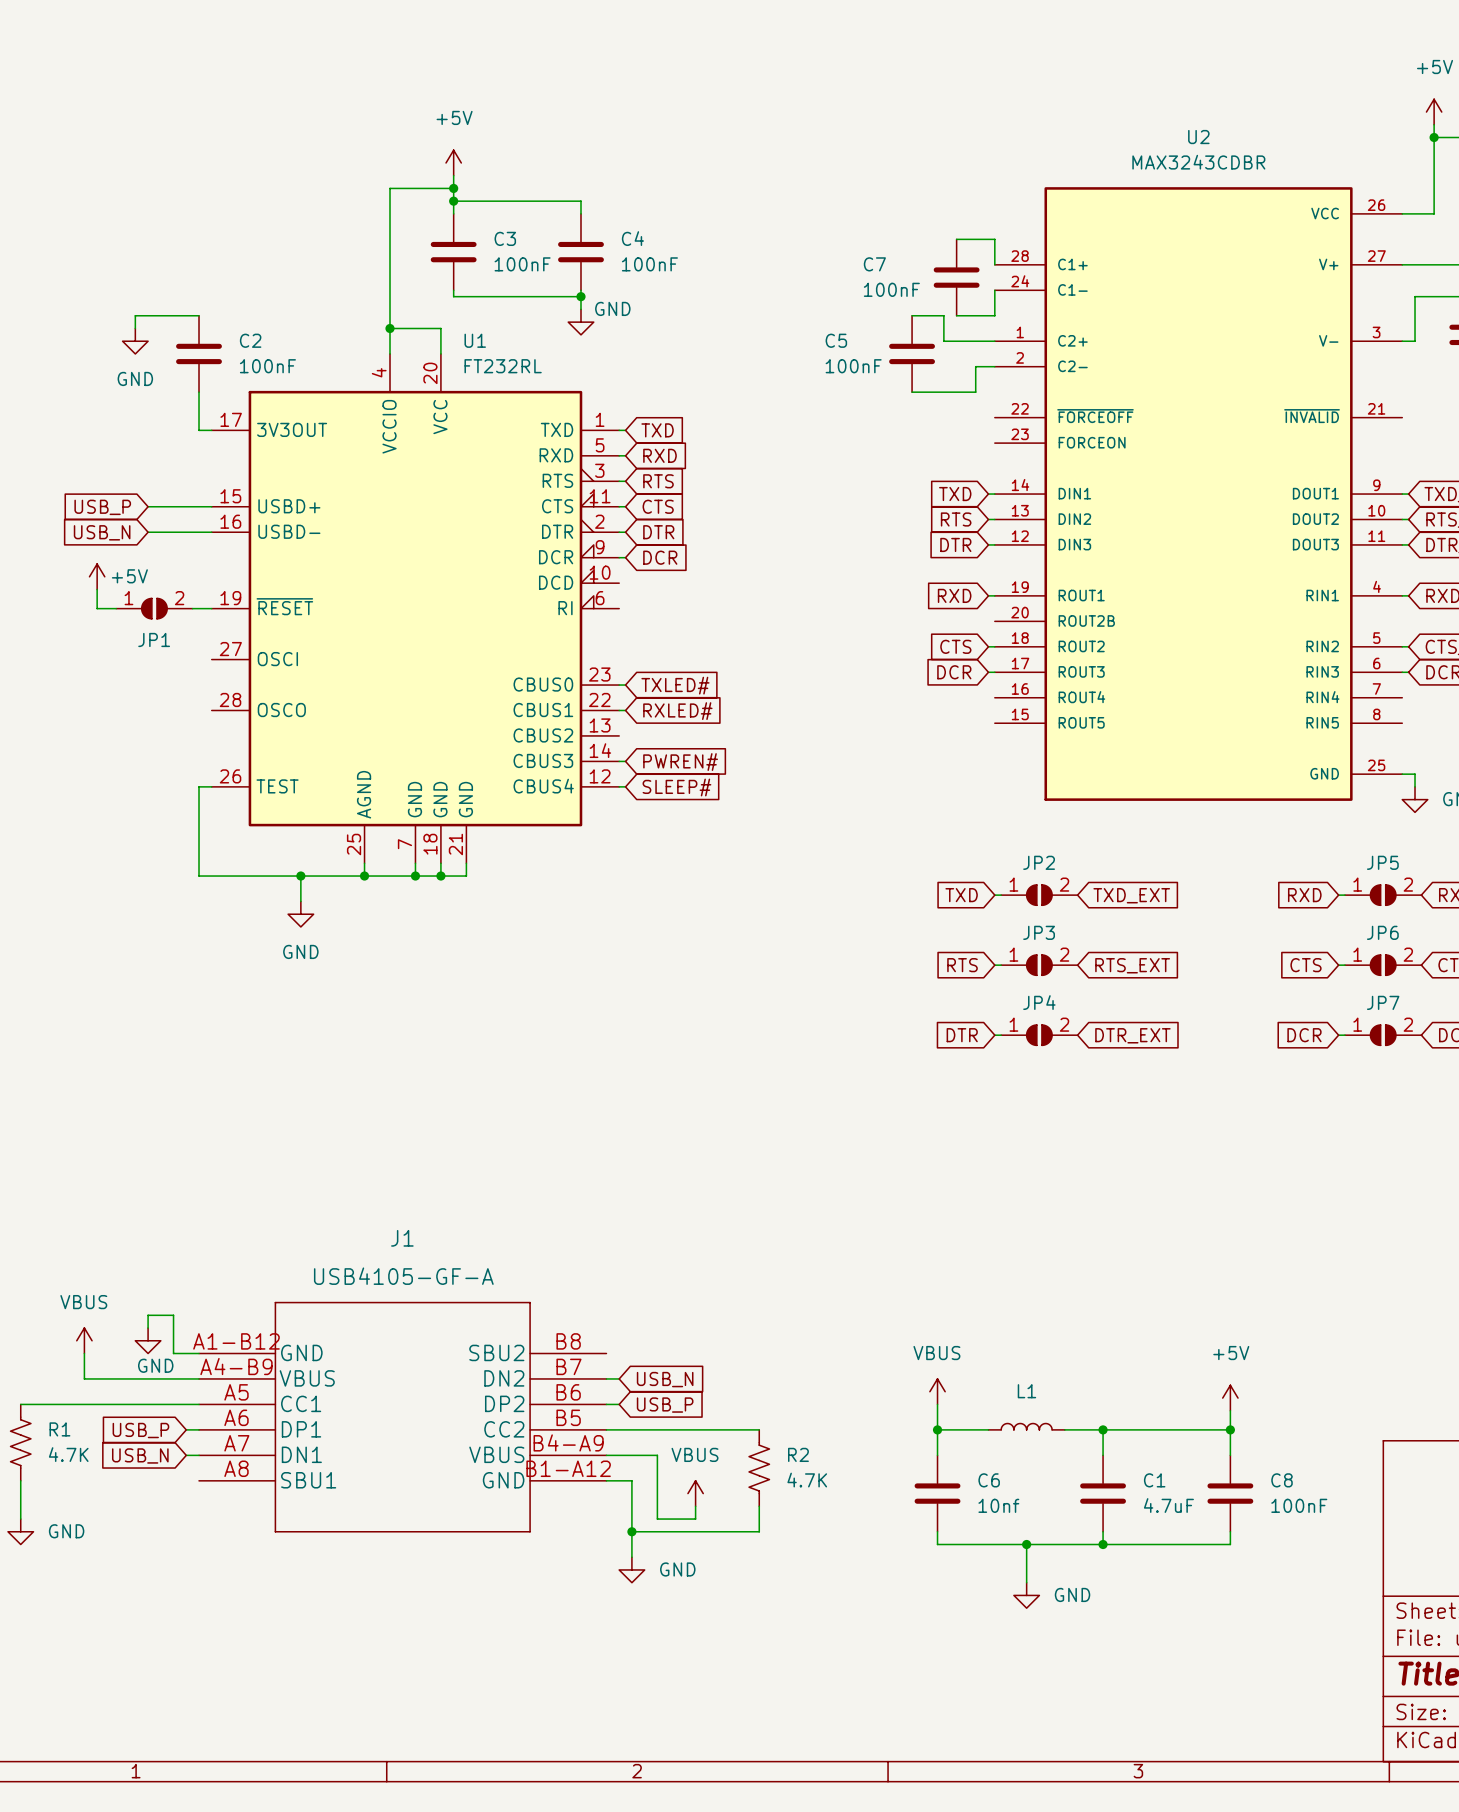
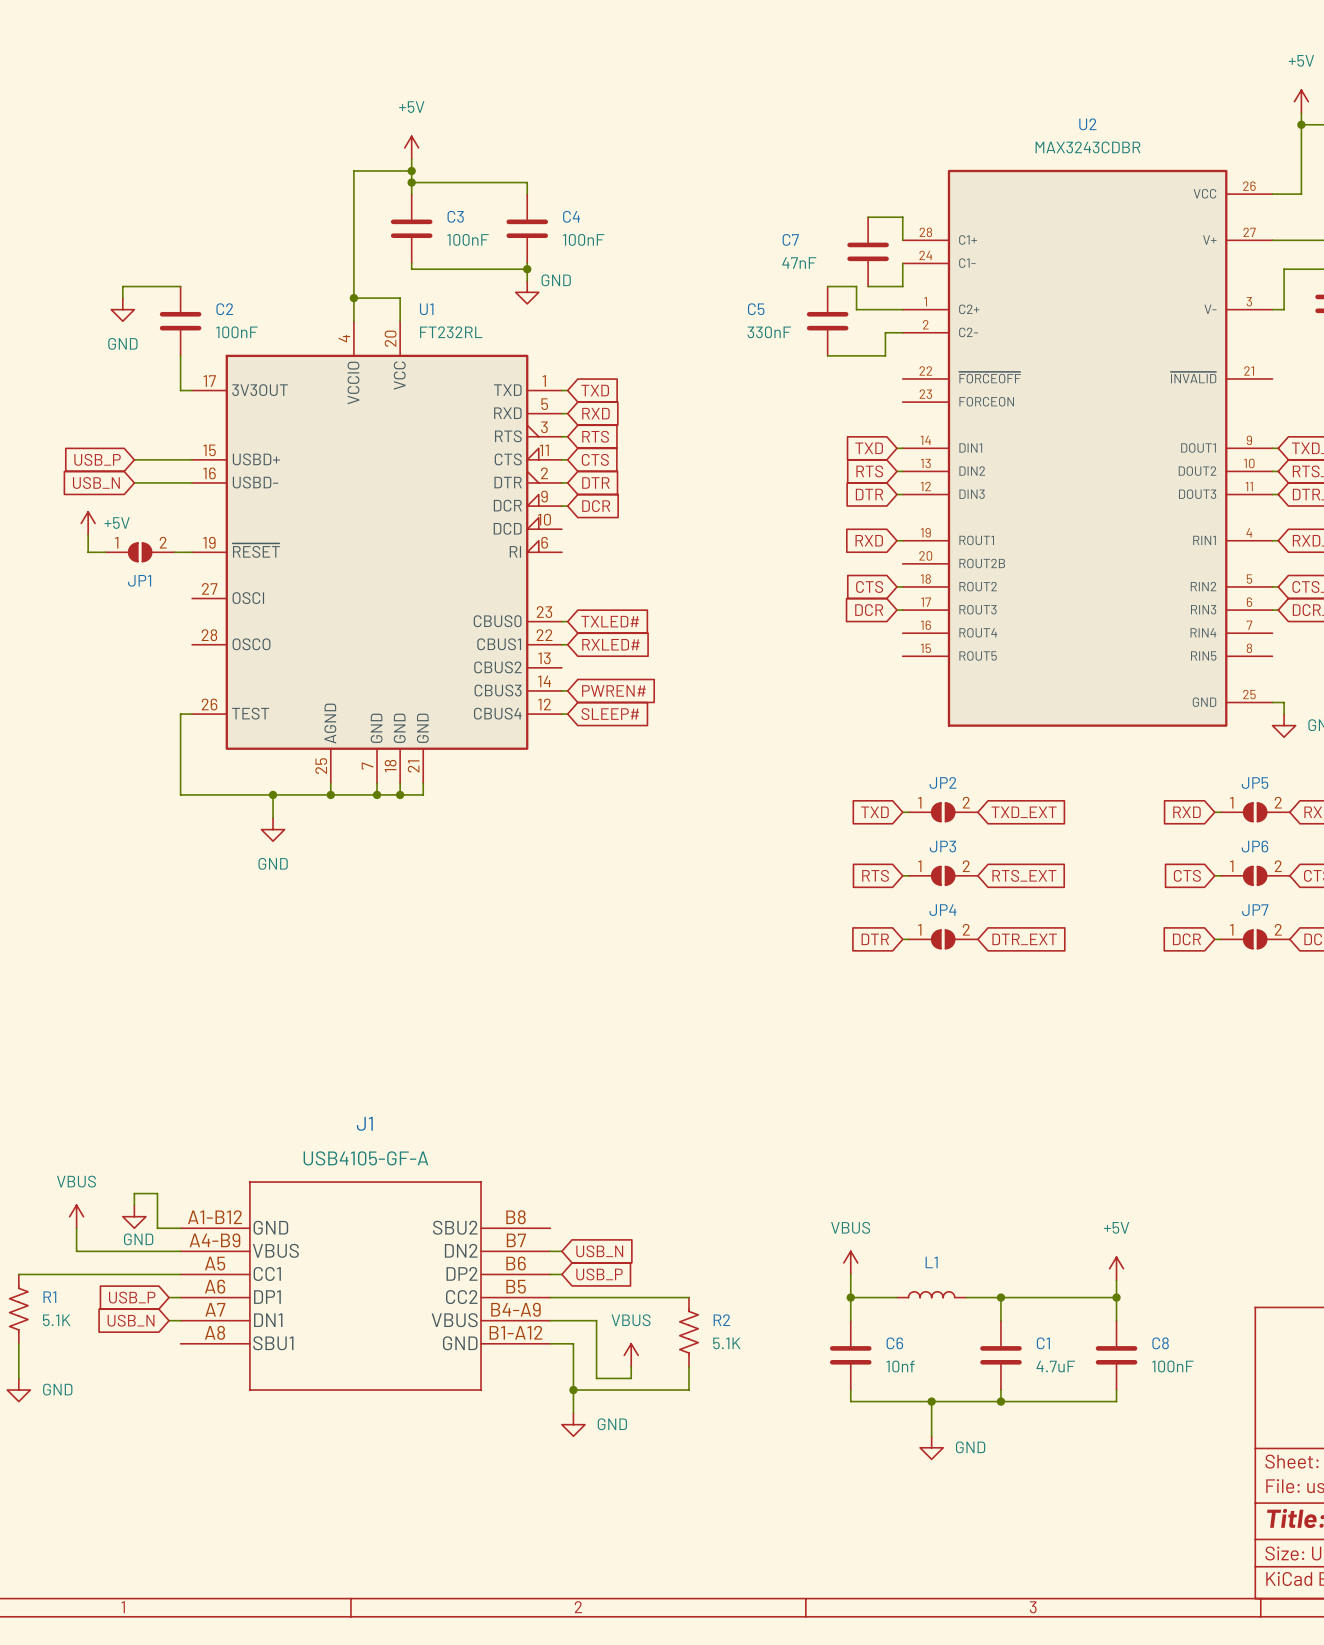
C7 value: 100nF (891, 289) -> 47nF (799, 263)
C5 value: 100nF (853, 366) -> 330nF (769, 332)
R1 value: 4.7K (68, 1454) -> 5.1K (56, 1320)
R2 value: 4.7K (807, 1480) -> 5.1K (726, 1343)

